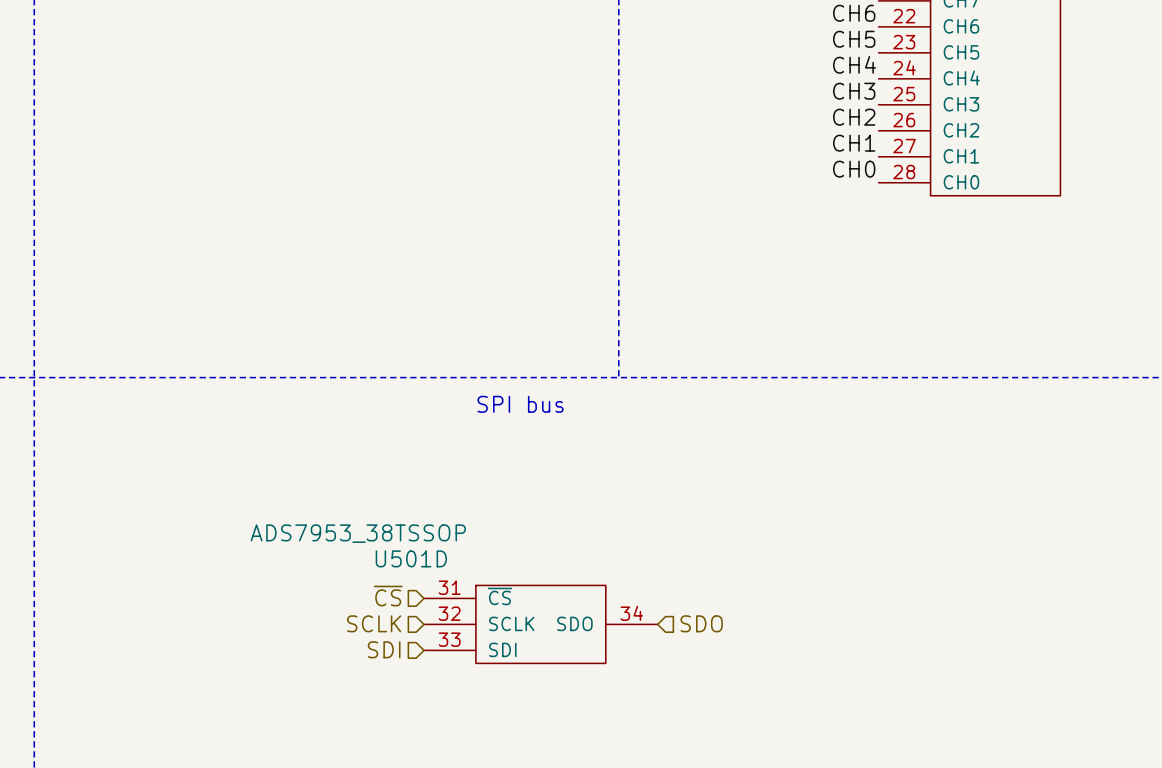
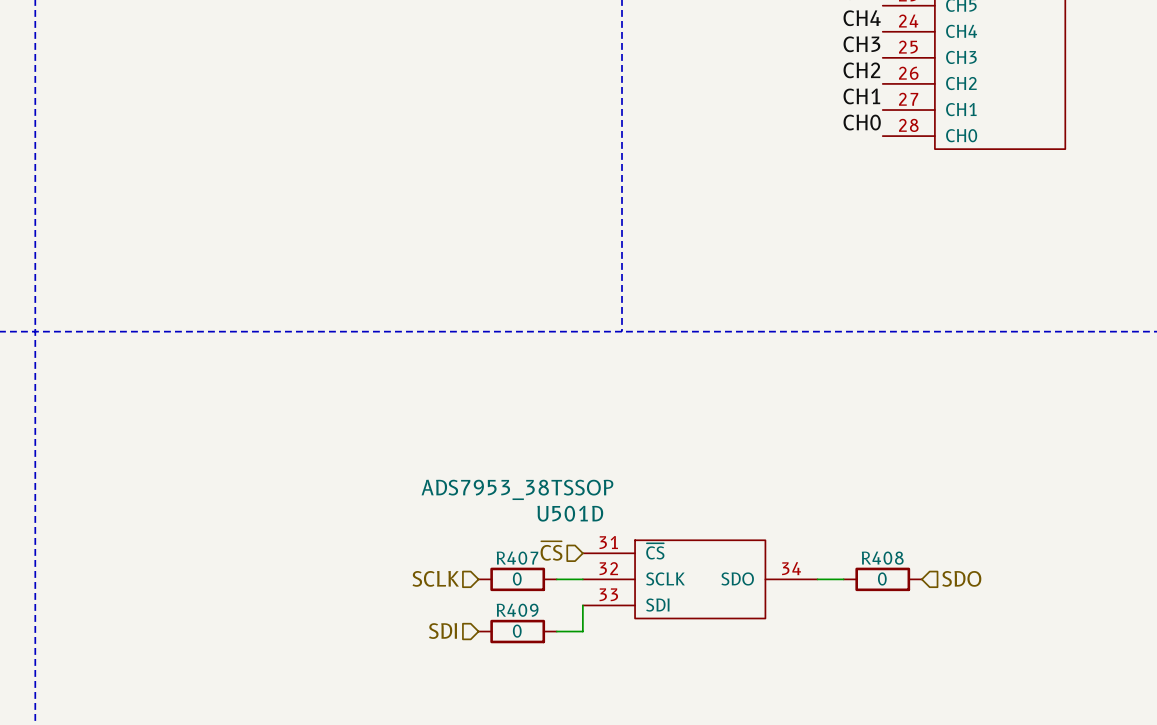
text: SPI bus (520, 404) -> none
hierarchical label position: ~{CS} (388, 596) -> ~{CS} (551, 551)
hierarchical label position: SCLK (374, 623) -> SCLK (435, 578)
hierarchical label: SDO (701, 623) -> none
hierarchical label: none -> SDO (961, 578)
R407: none -> 0 (517, 579)
U501D position: (540, 624) -> (700, 579)
wire: none -> (556, 579) (582, 579)
wire: none -> (817, 579) (843, 579)
R408: none -> 0 (882, 579)
hierarchical label position: SDI (384, 649) -> SDI (442, 631)
wire: none -> (582, 605) (582, 631) (556, 631)
R409: none -> 0 (517, 631)

